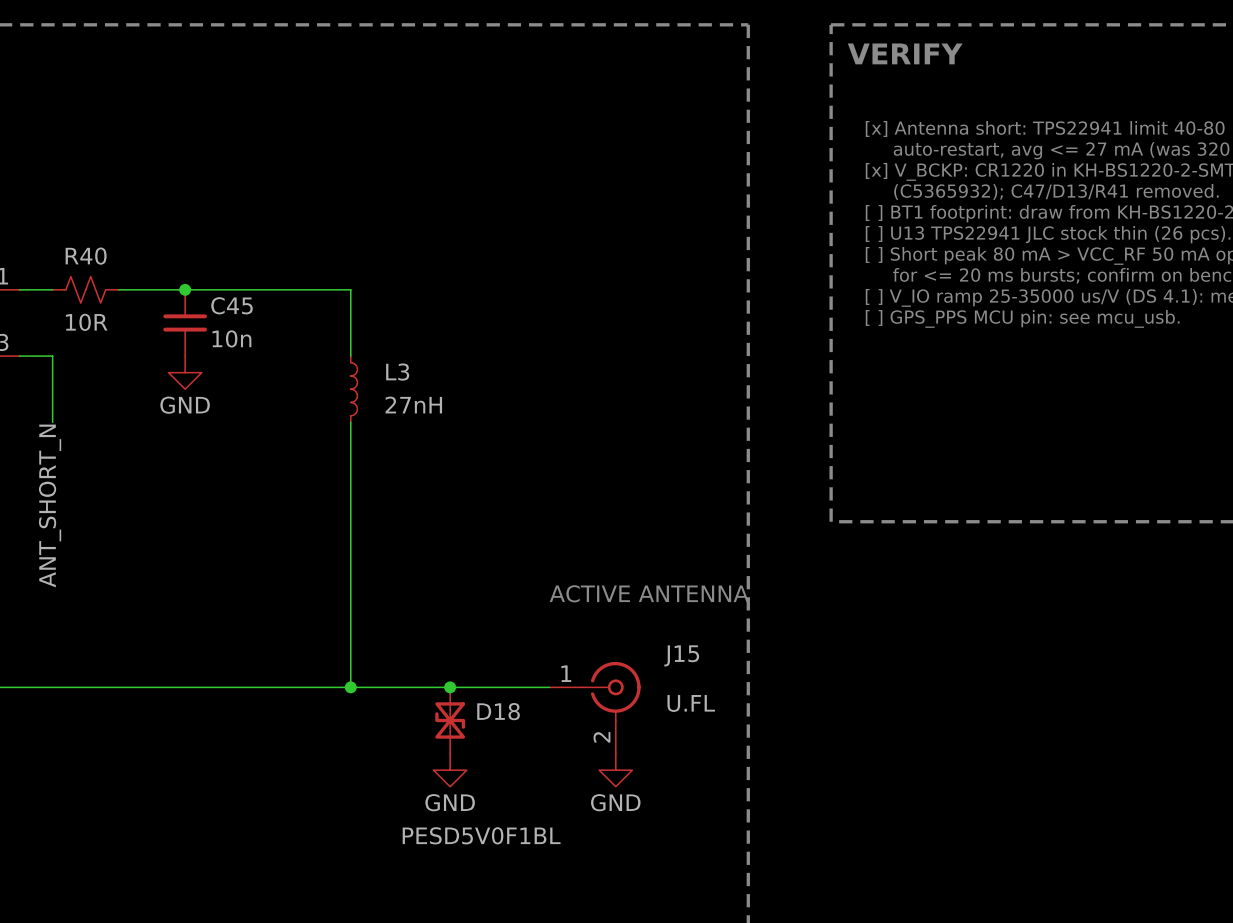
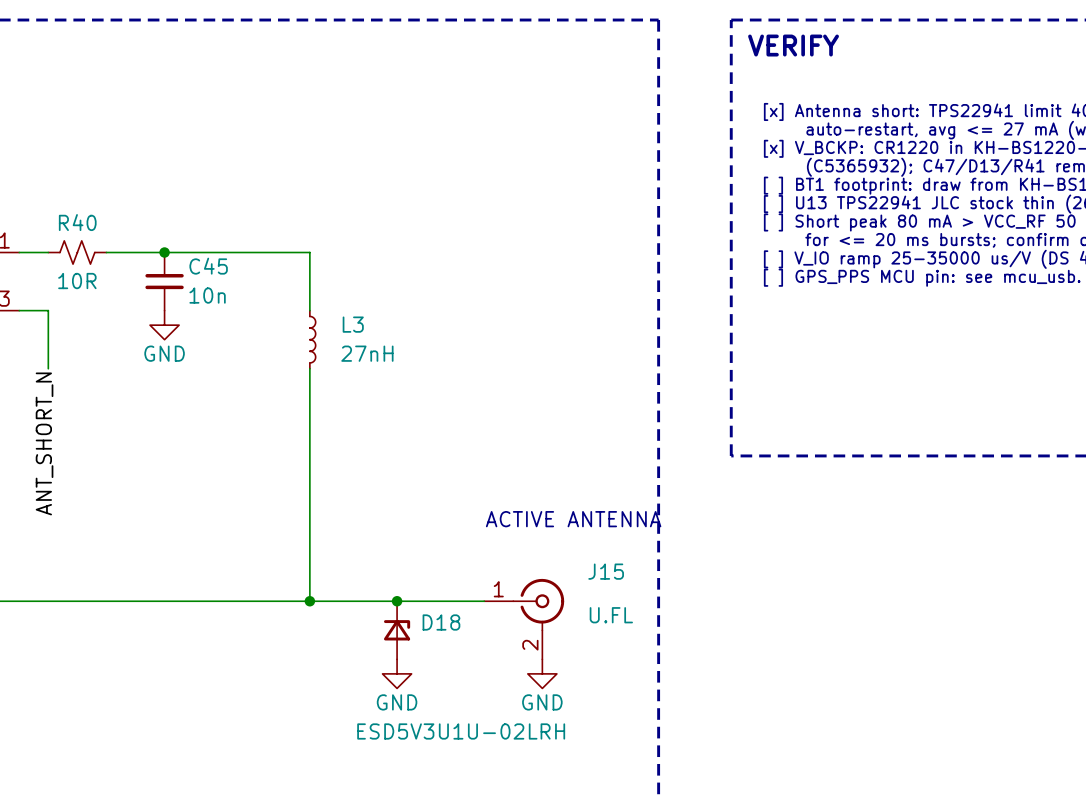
D18 symbol: [435, 687, 466, 754] -> [383, 601, 411, 660]
D18 value: PESD5V0F1BL (481, 835) -> ESD5V3U1U-02LRH (461, 731)

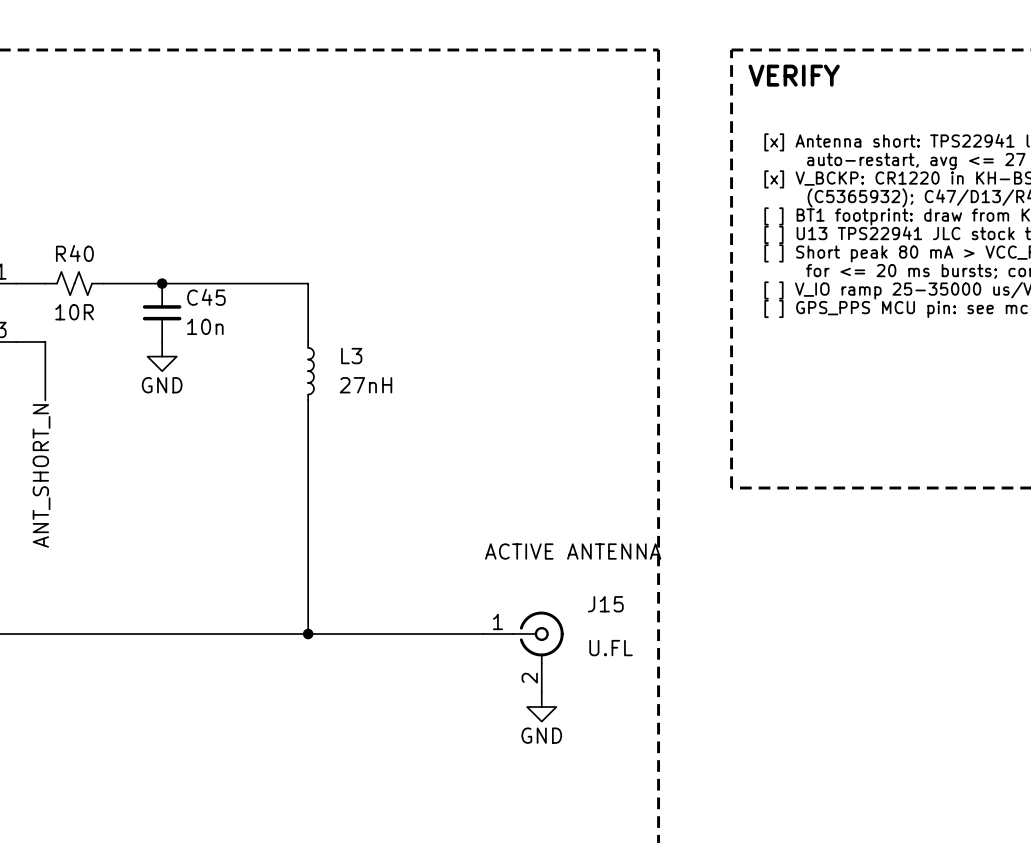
junction: (397, 601) -> none
D18: ESD5V3U1U-02LRH (397, 630) -> none
power symbol: GND (397, 673) -> none

